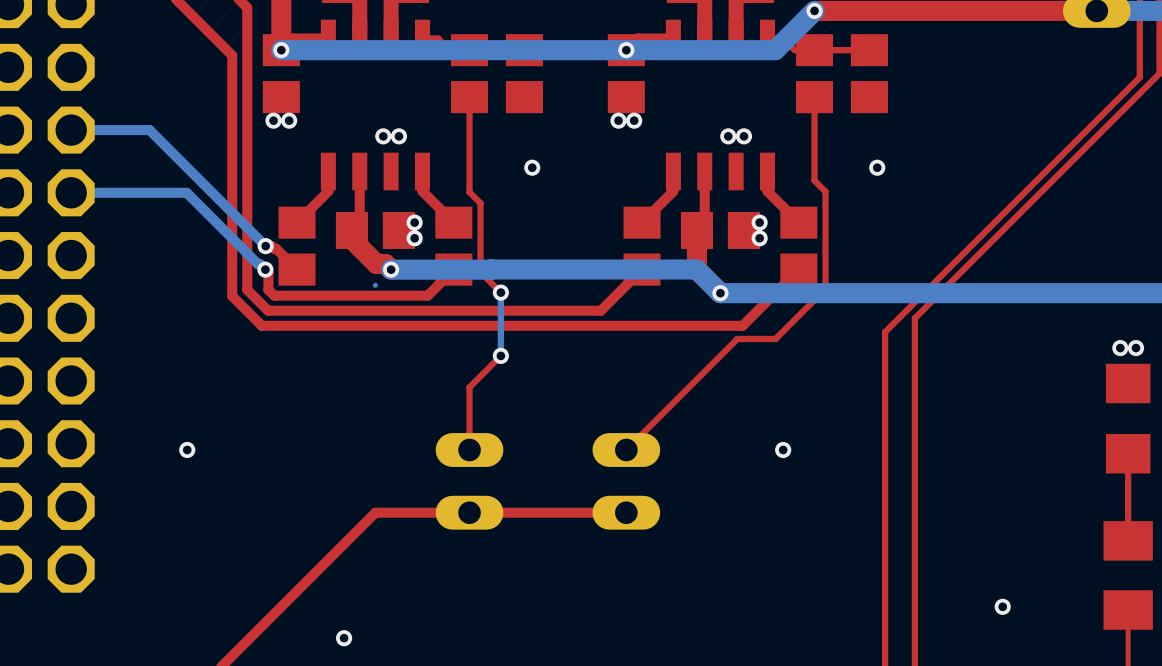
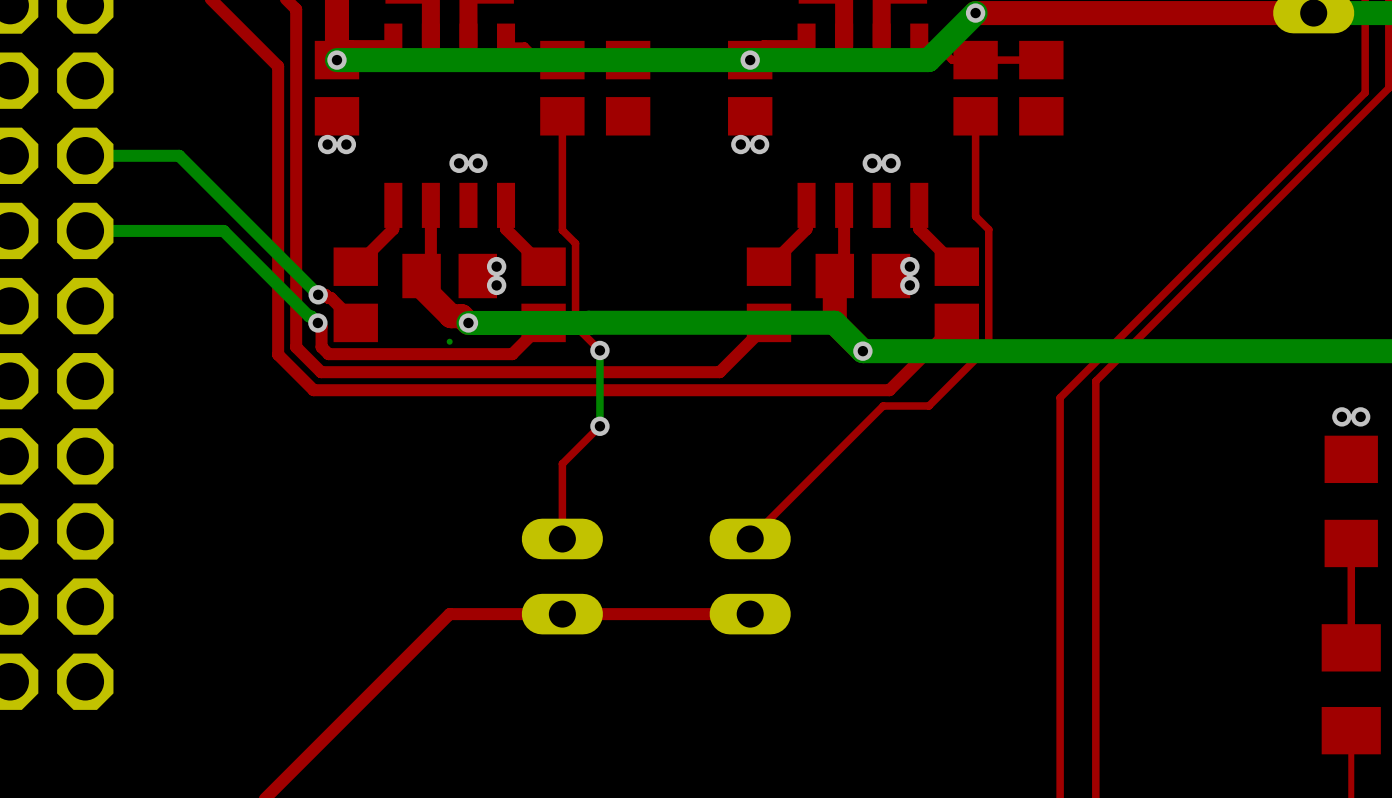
via: (532, 167) -> none
via: (877, 167) -> none
via: (187, 449) -> none
via: (783, 449) -> none
via: (1002, 606) -> none
via: (344, 638) -> none

